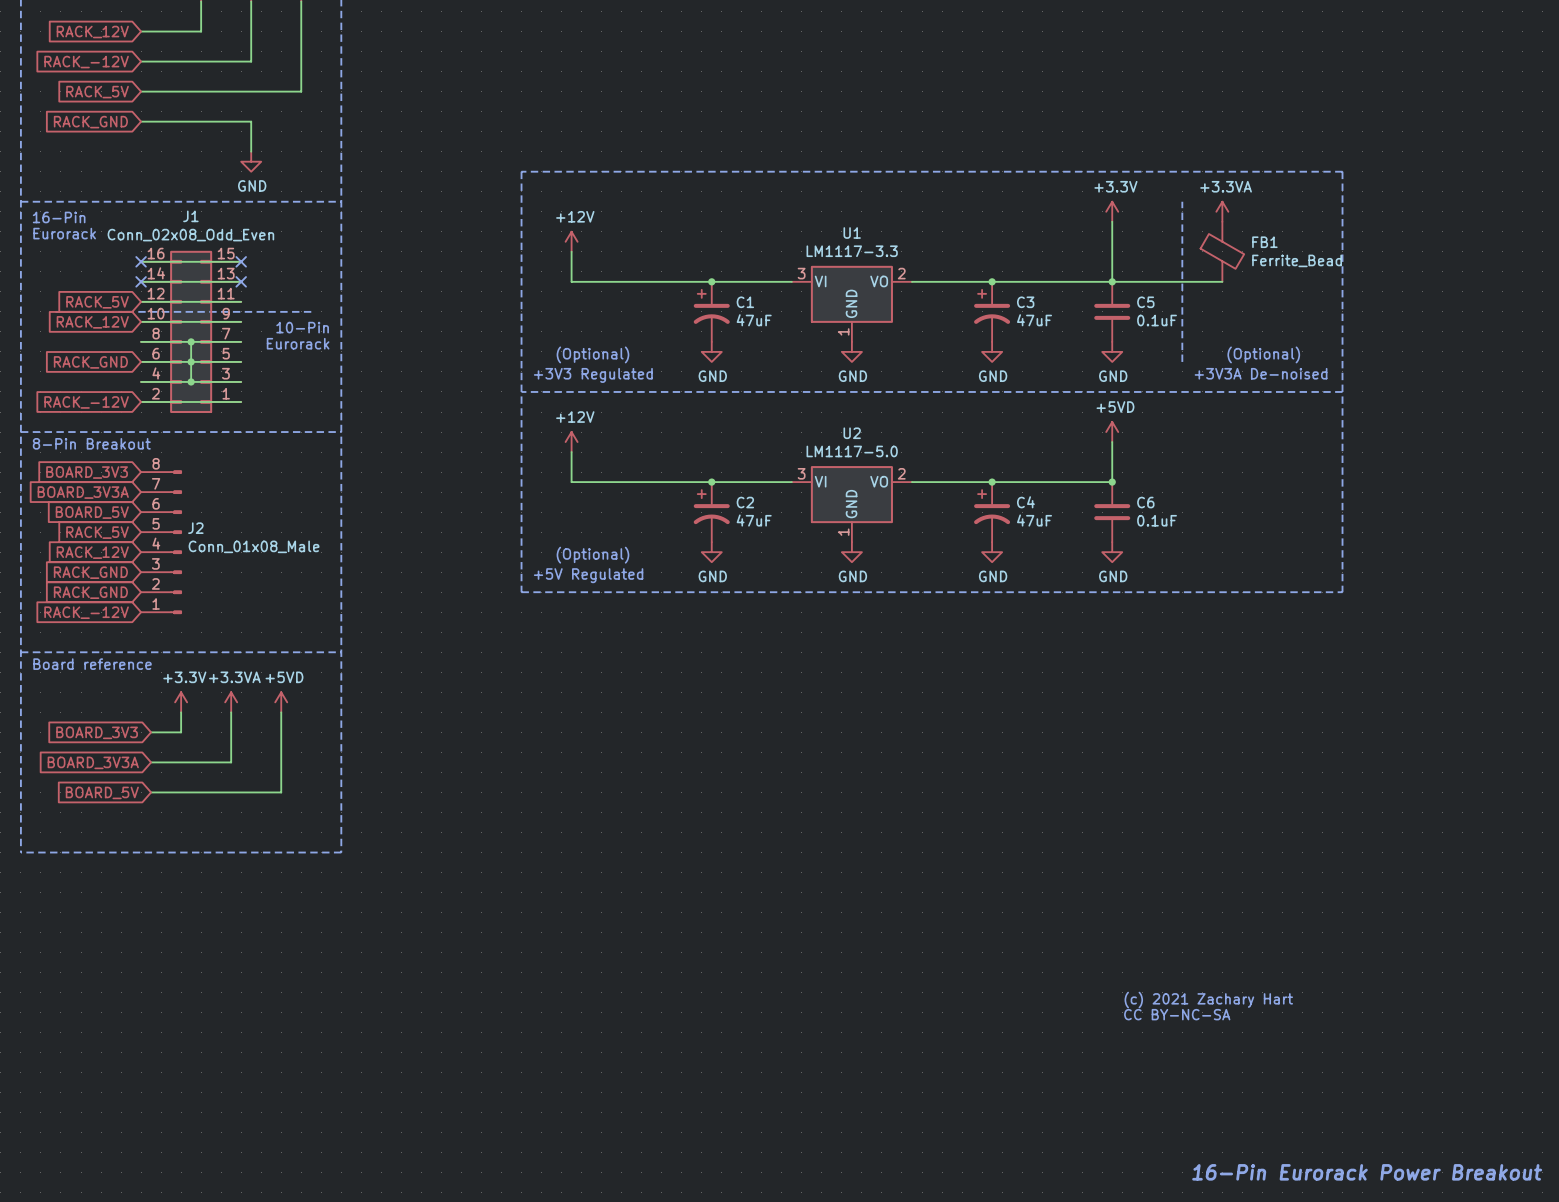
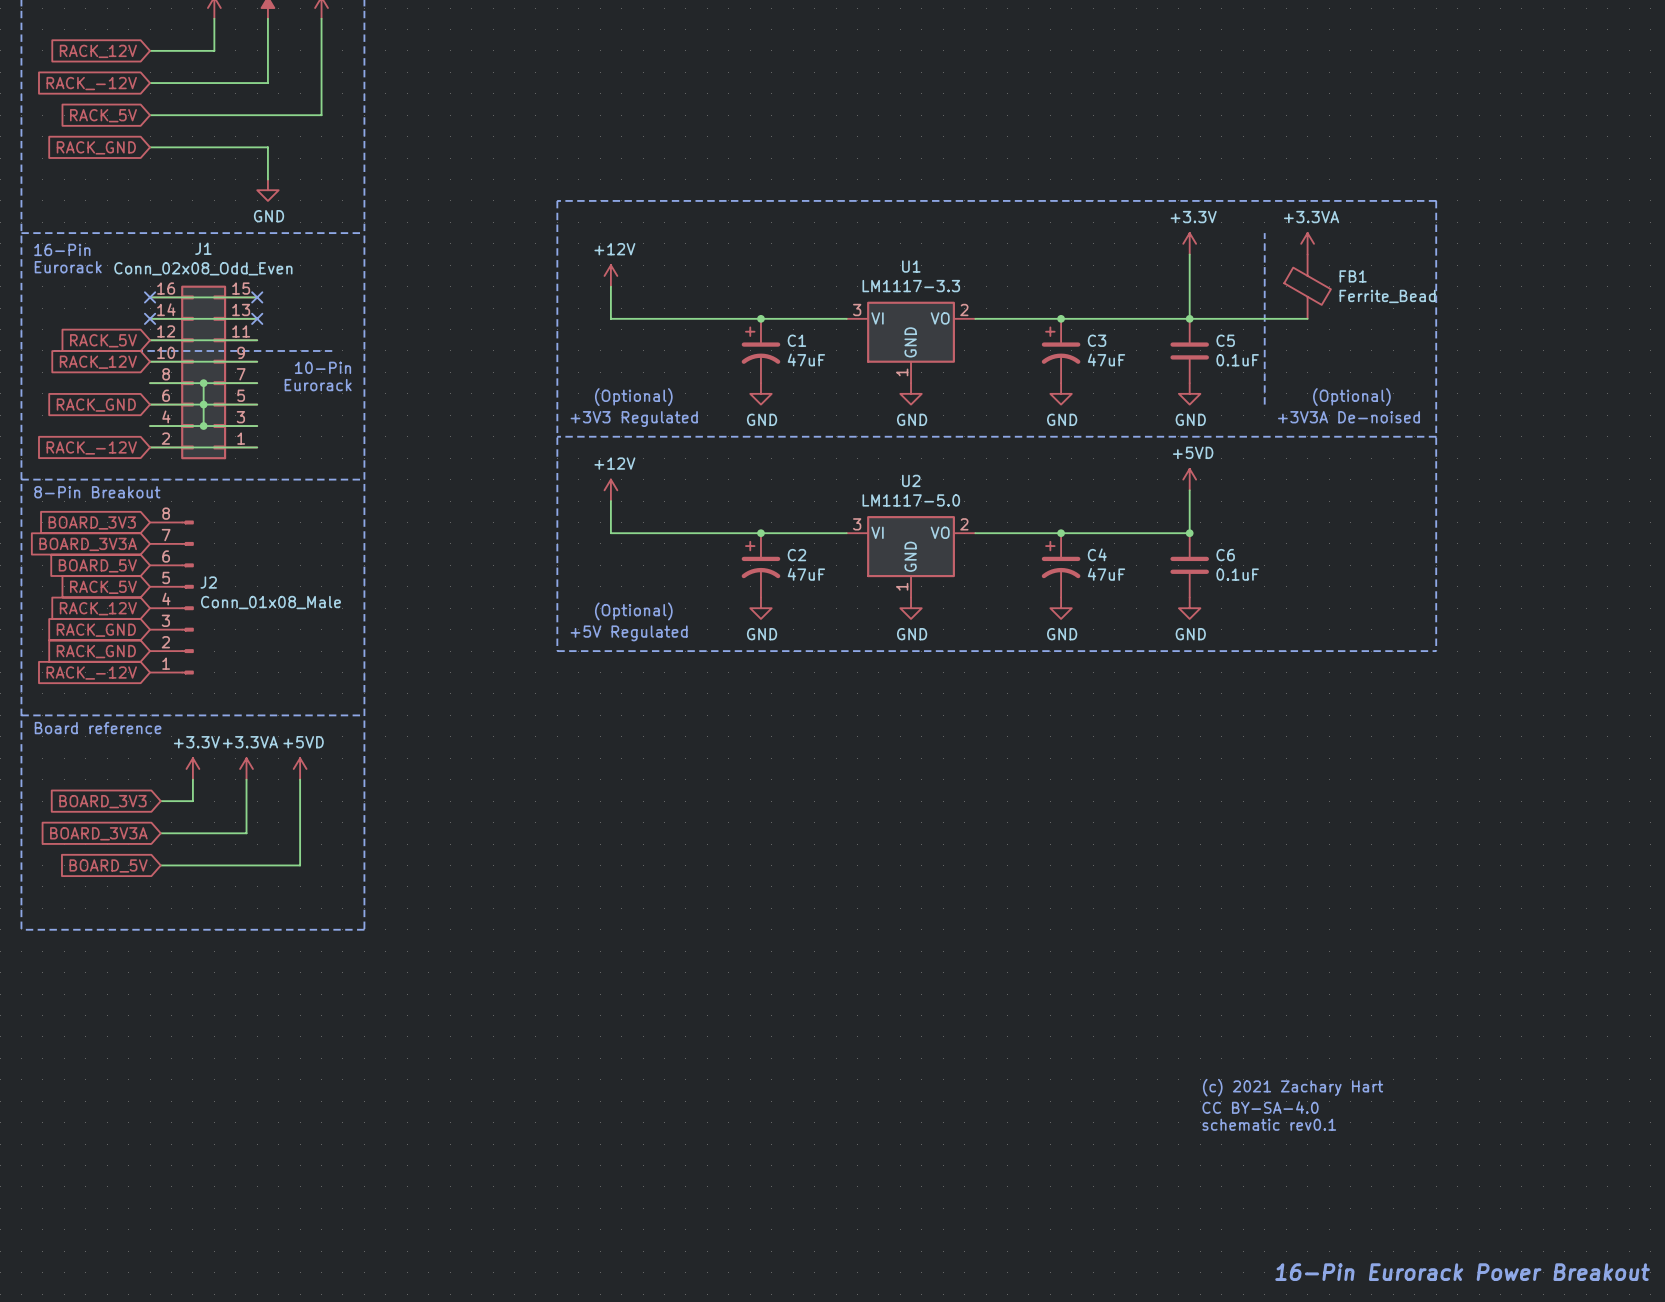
text: CC BY-NC-SA (1177, 1014) -> CC BY-SA-4.0 (1260, 1107)
text: none -> schematic rev0.1 (1269, 1124)

